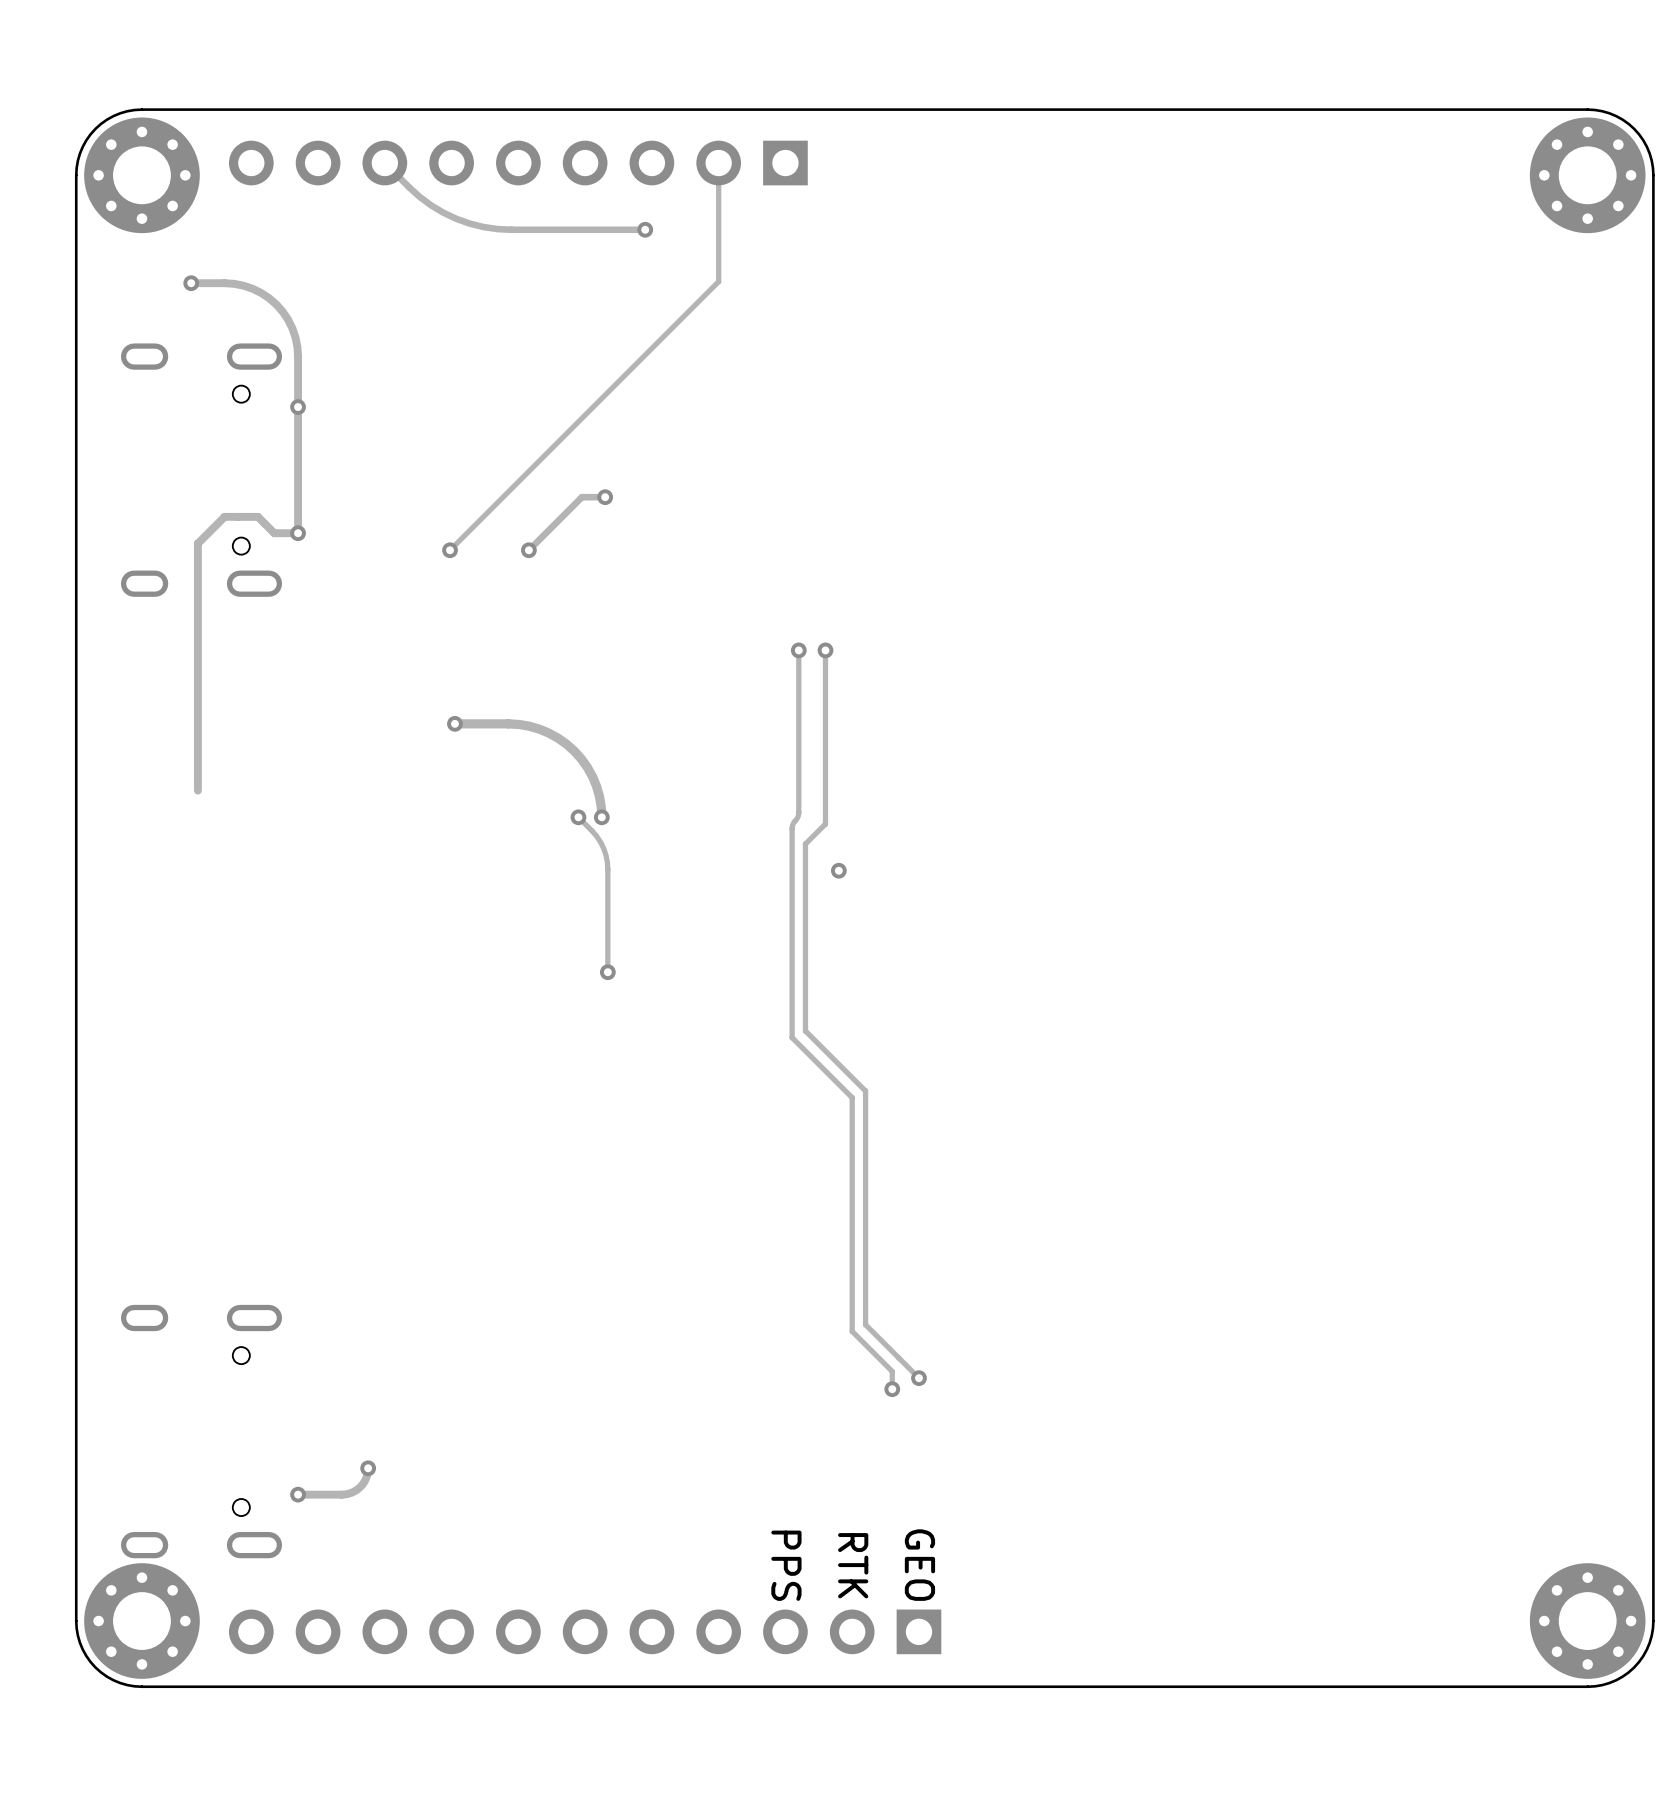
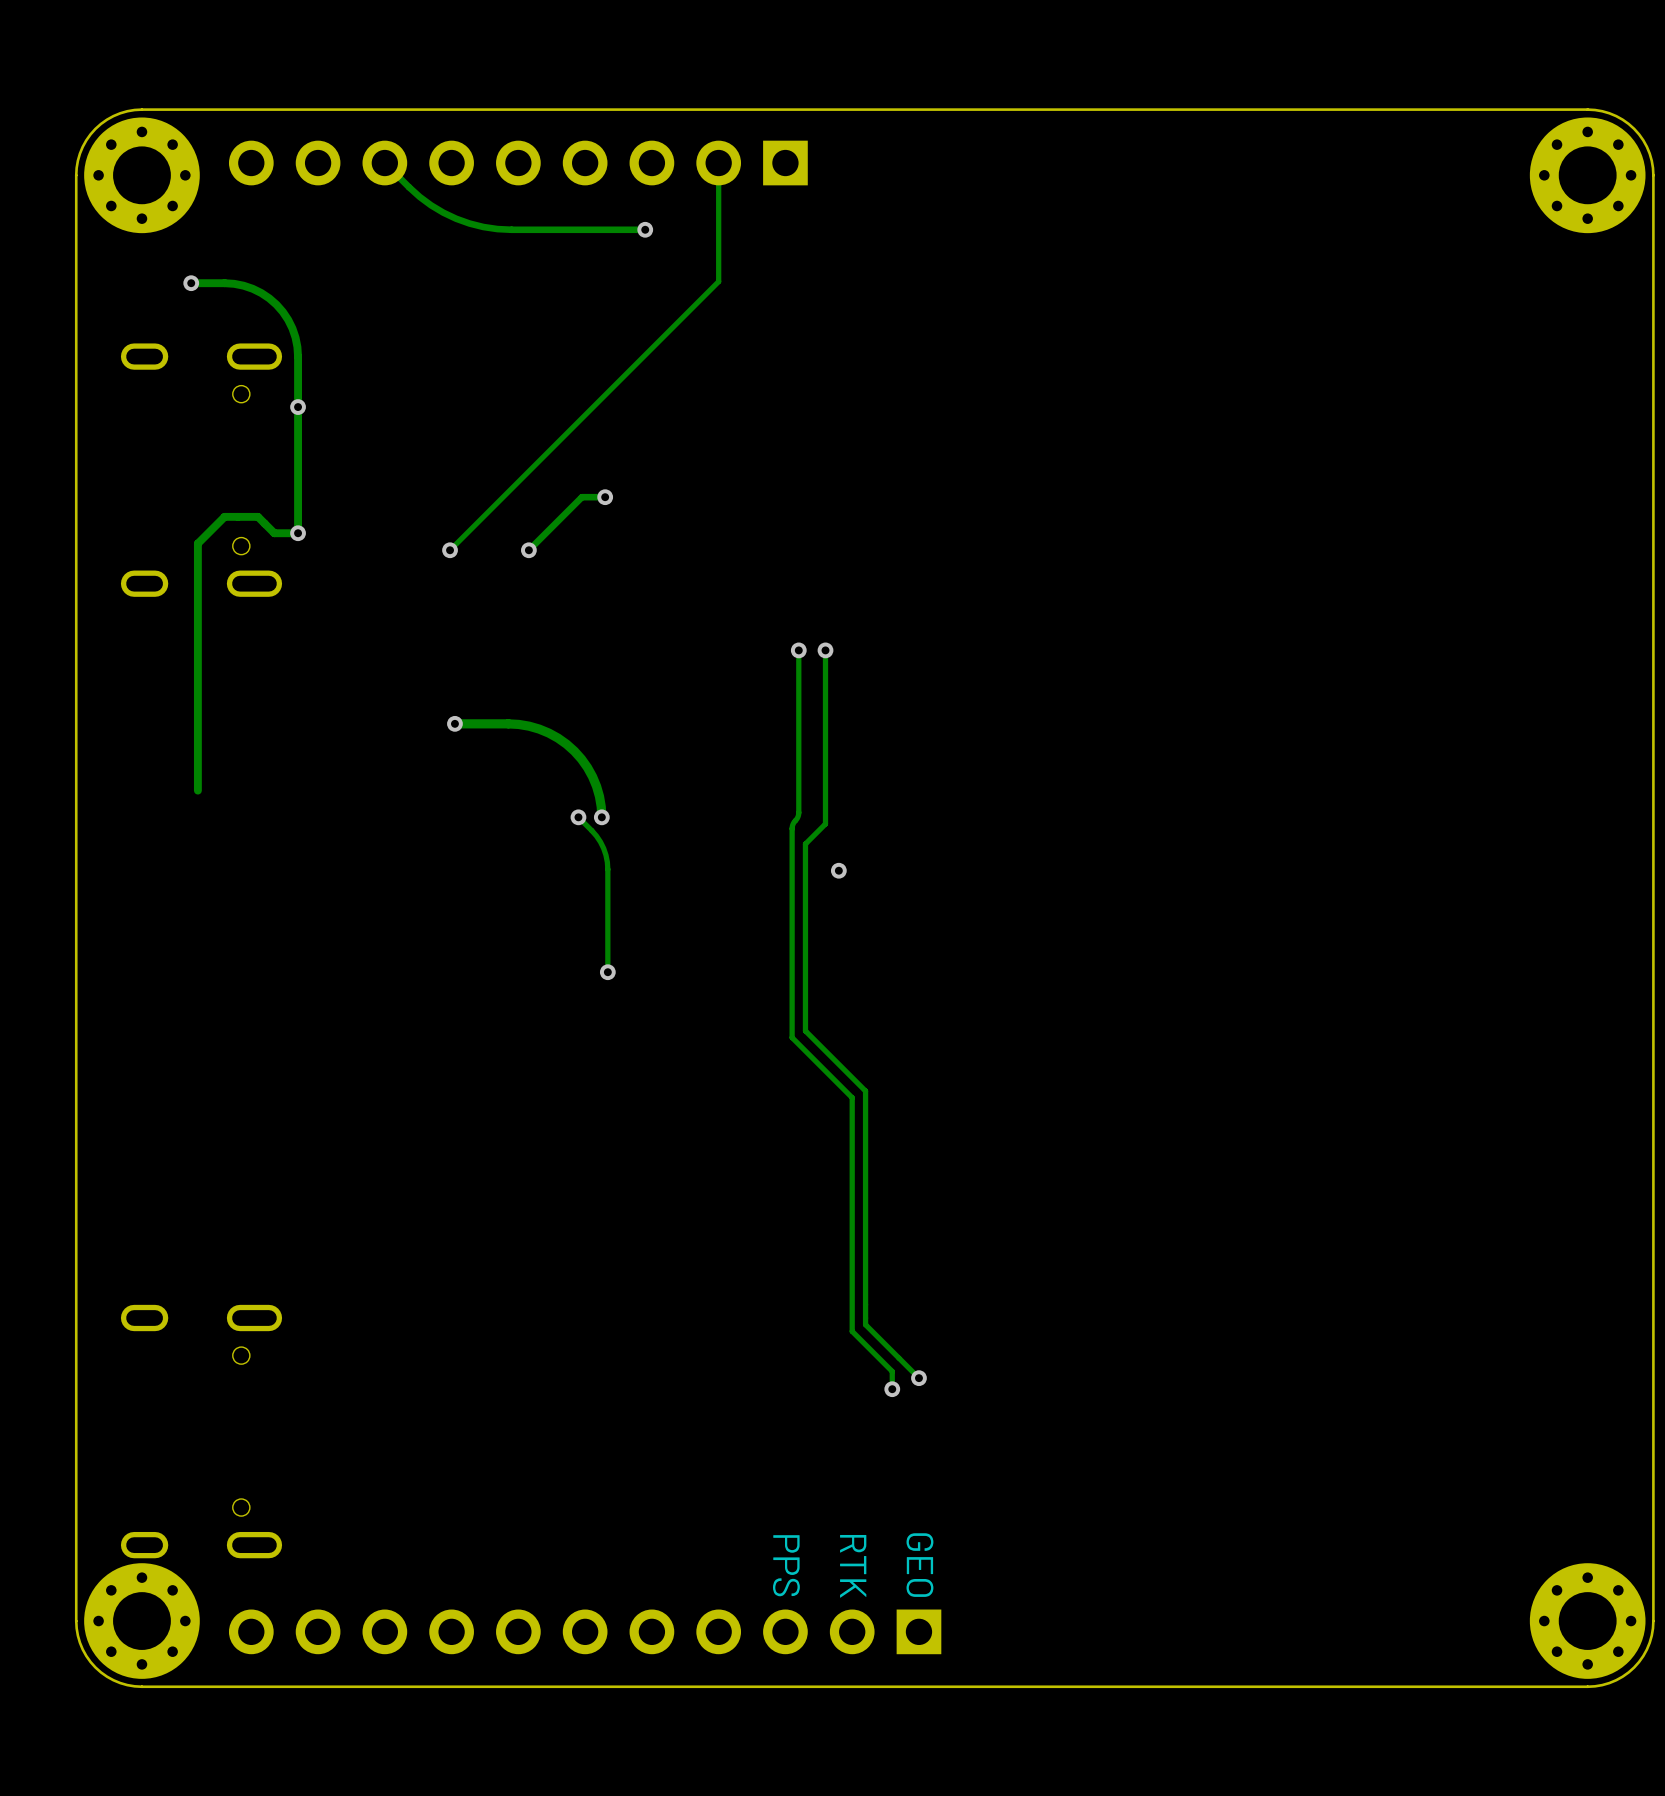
track: (368, 1468) (362, 1484) (351, 1492) (341, 1494) (298, 1494) -> none
via: (368, 1468) -> none
via: (298, 1494) -> none

